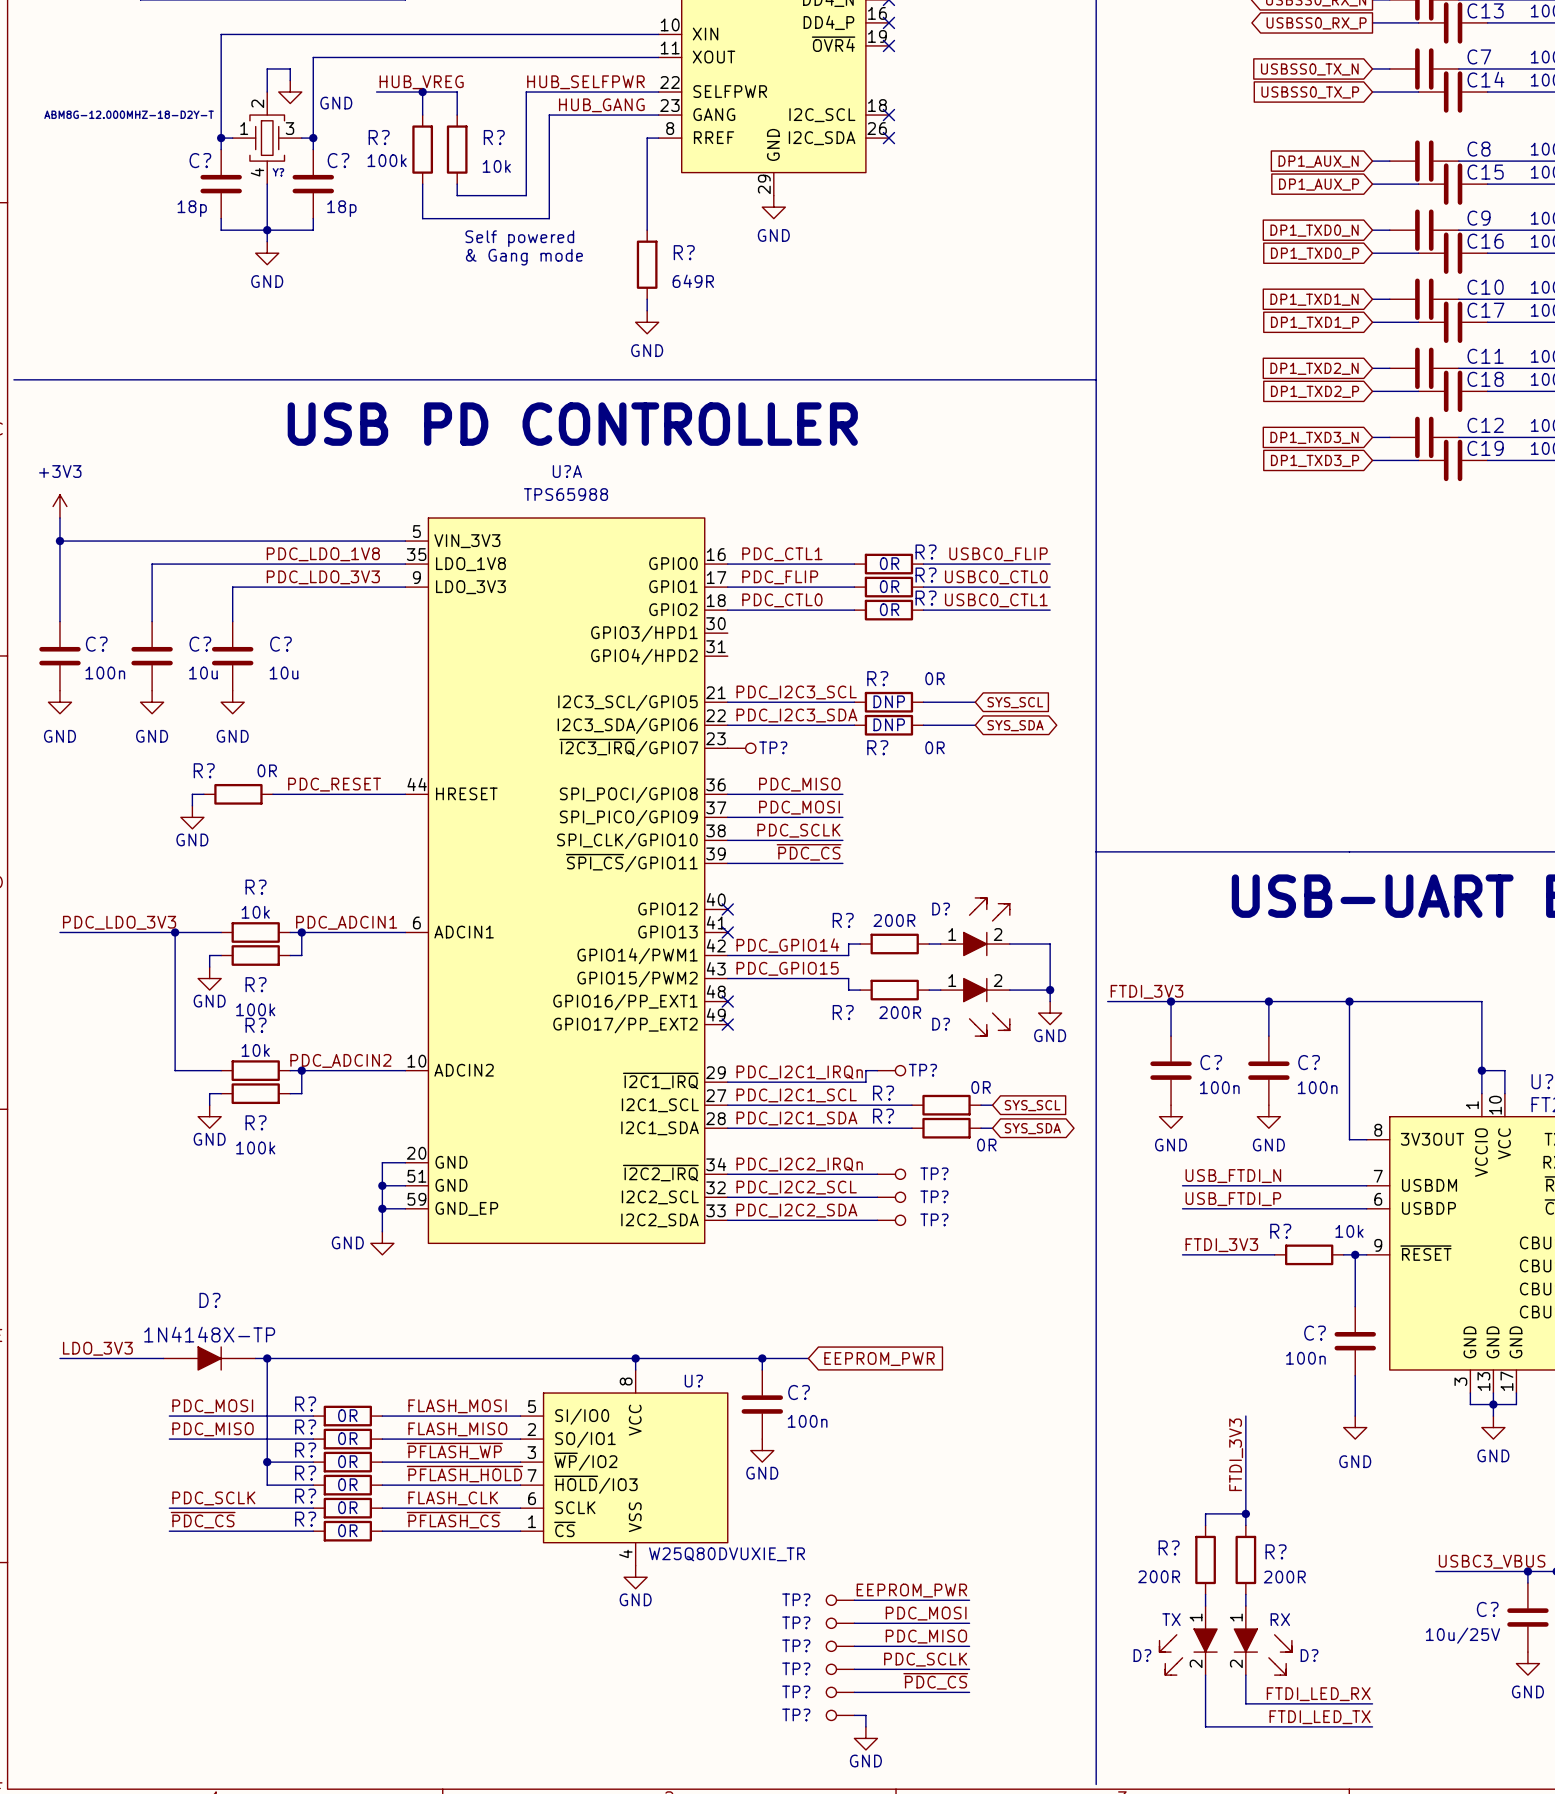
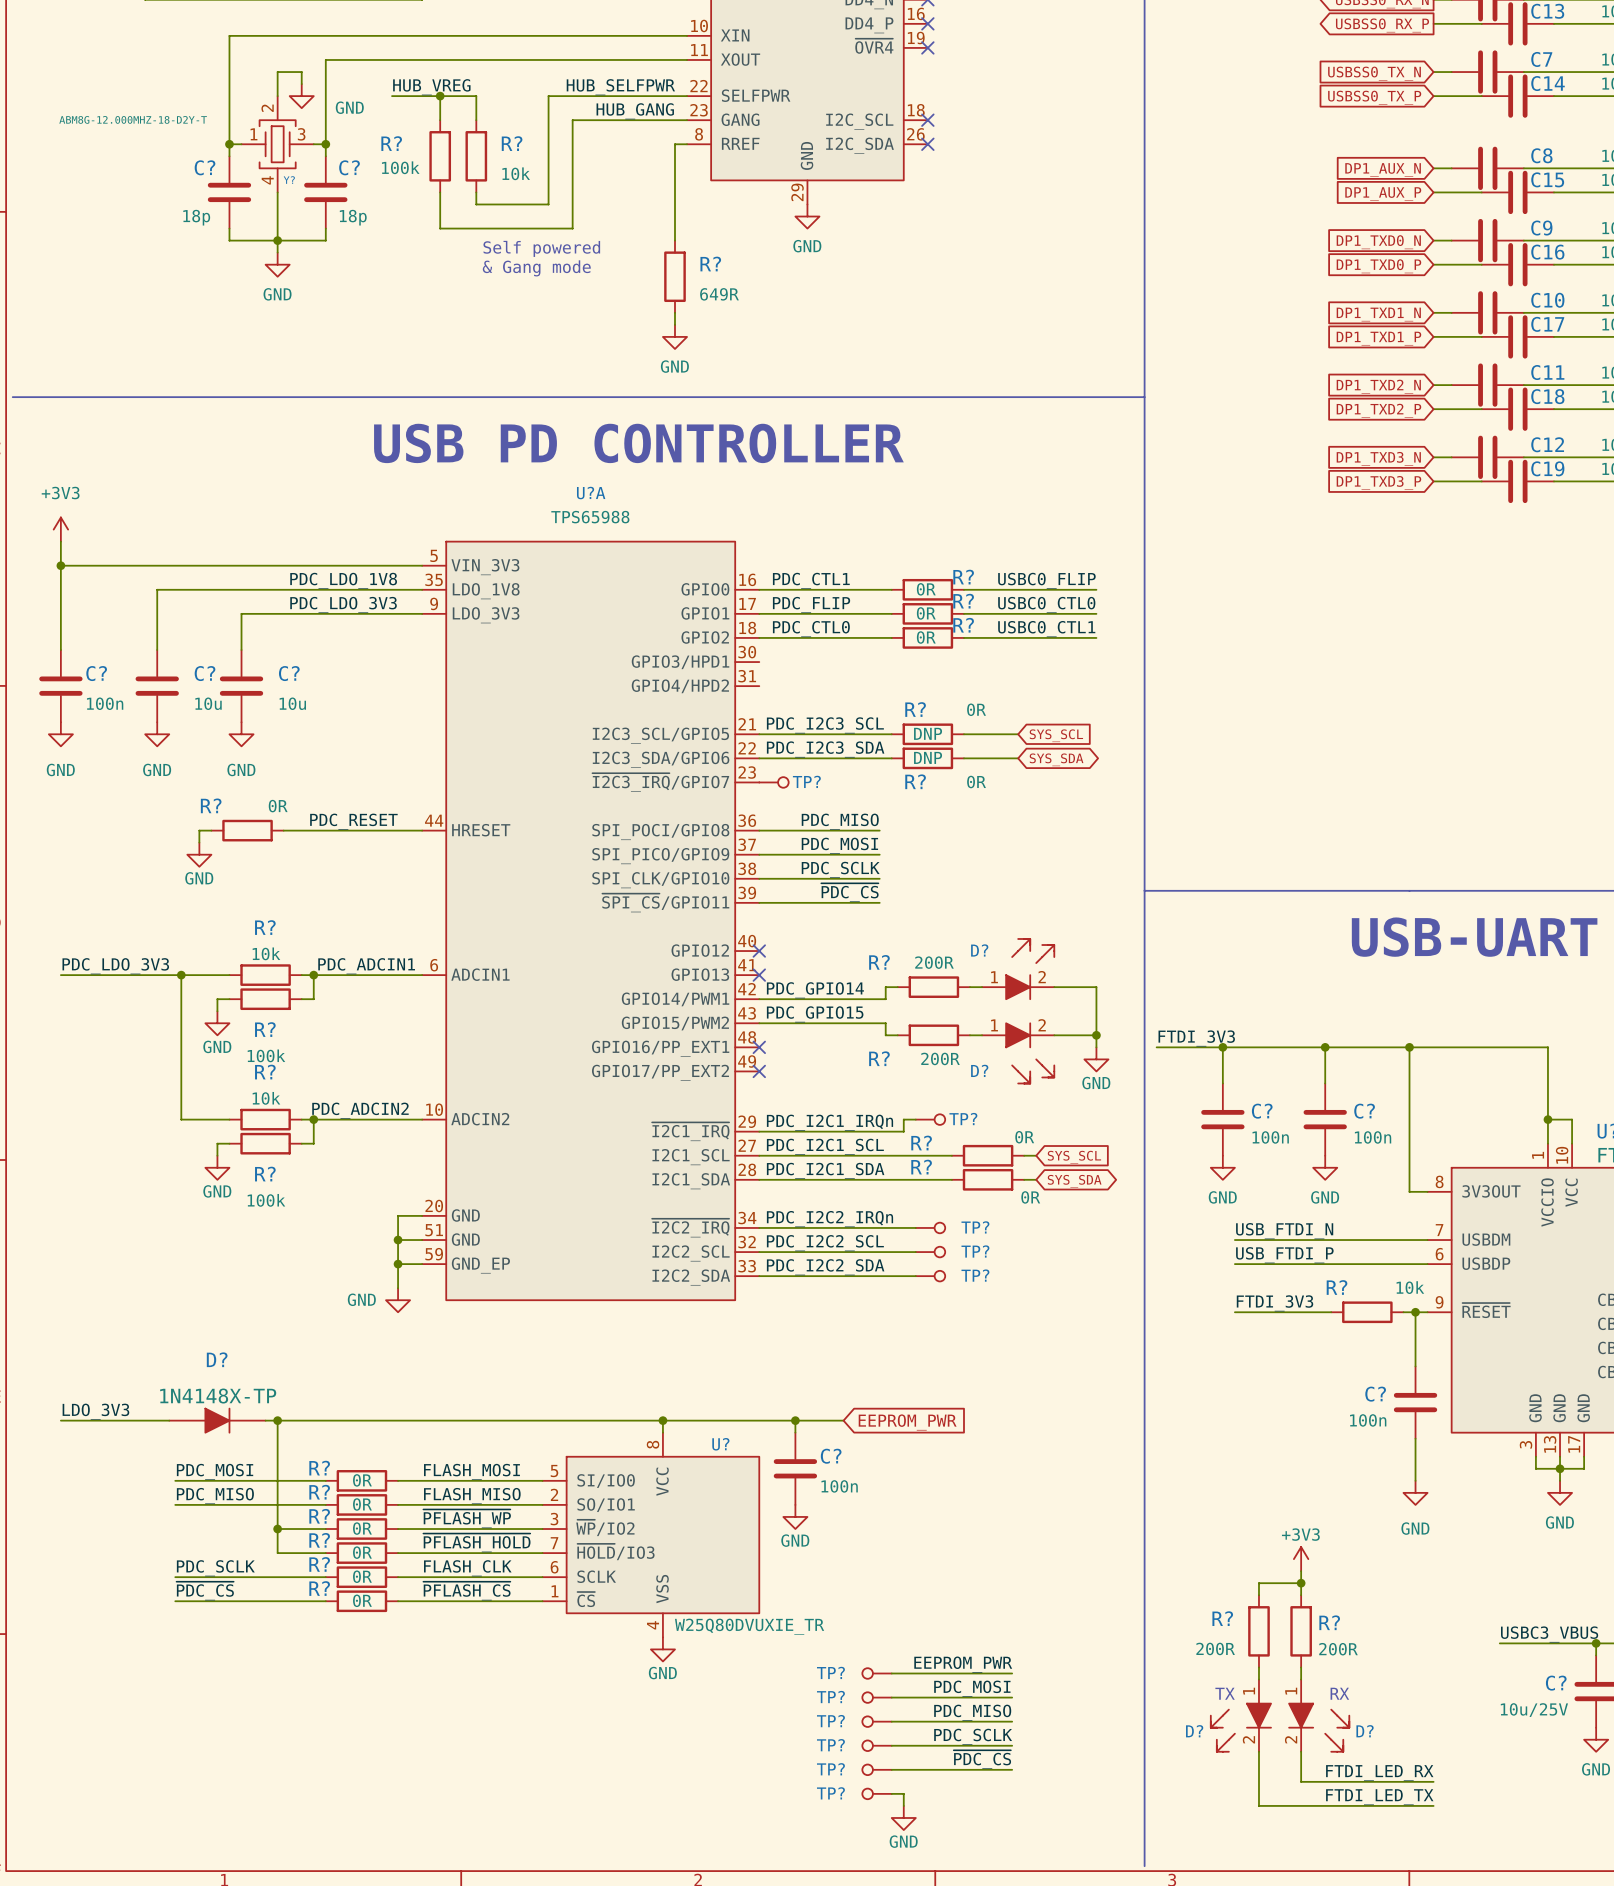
wire: (1245, 1416) (1245, 1502) -> none
label: FTDI_3V3 (1236, 1454) -> none
power symbol: none -> +3V3 (1301, 1559)

